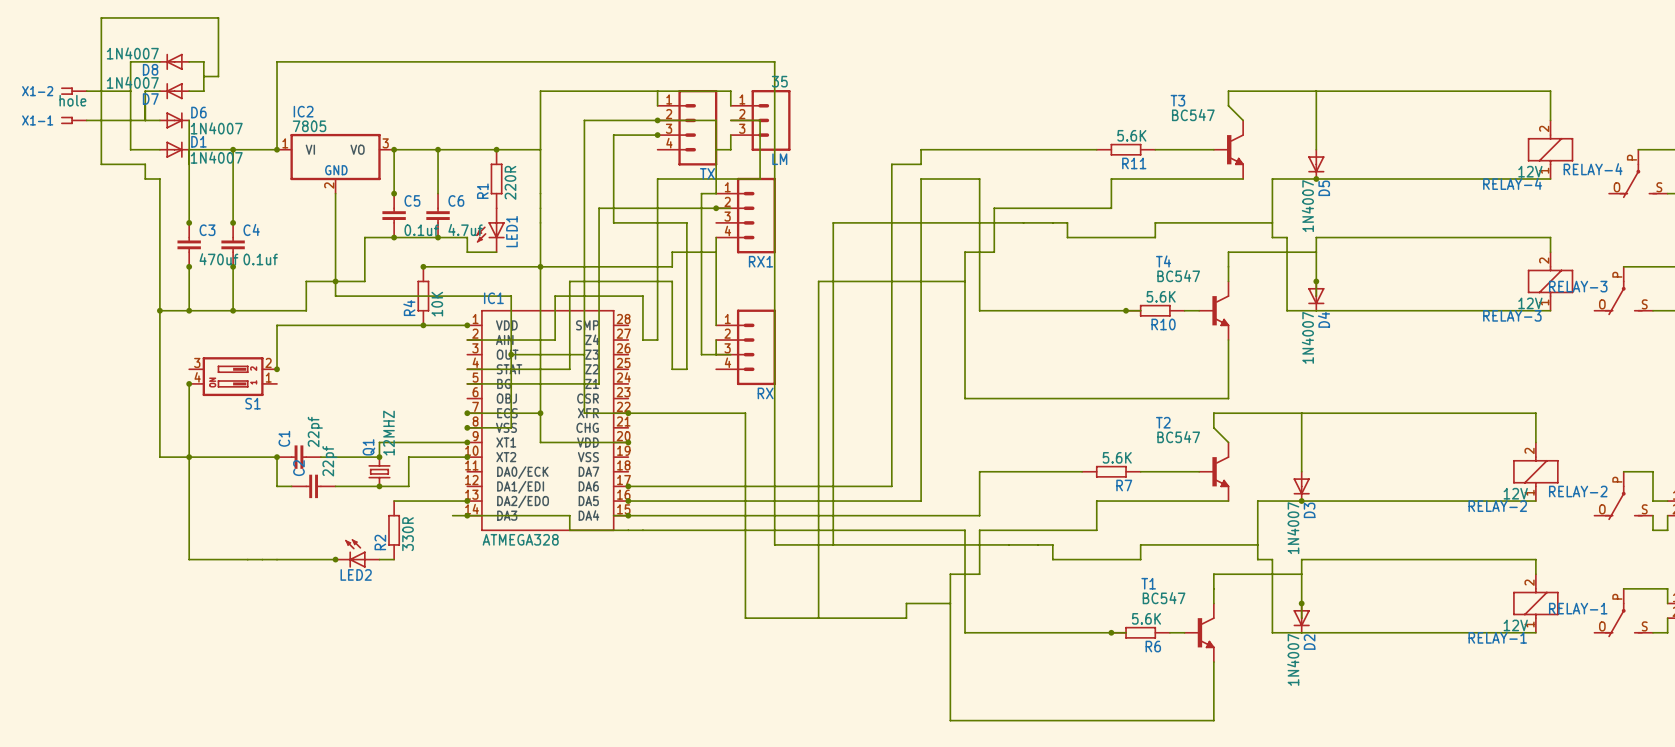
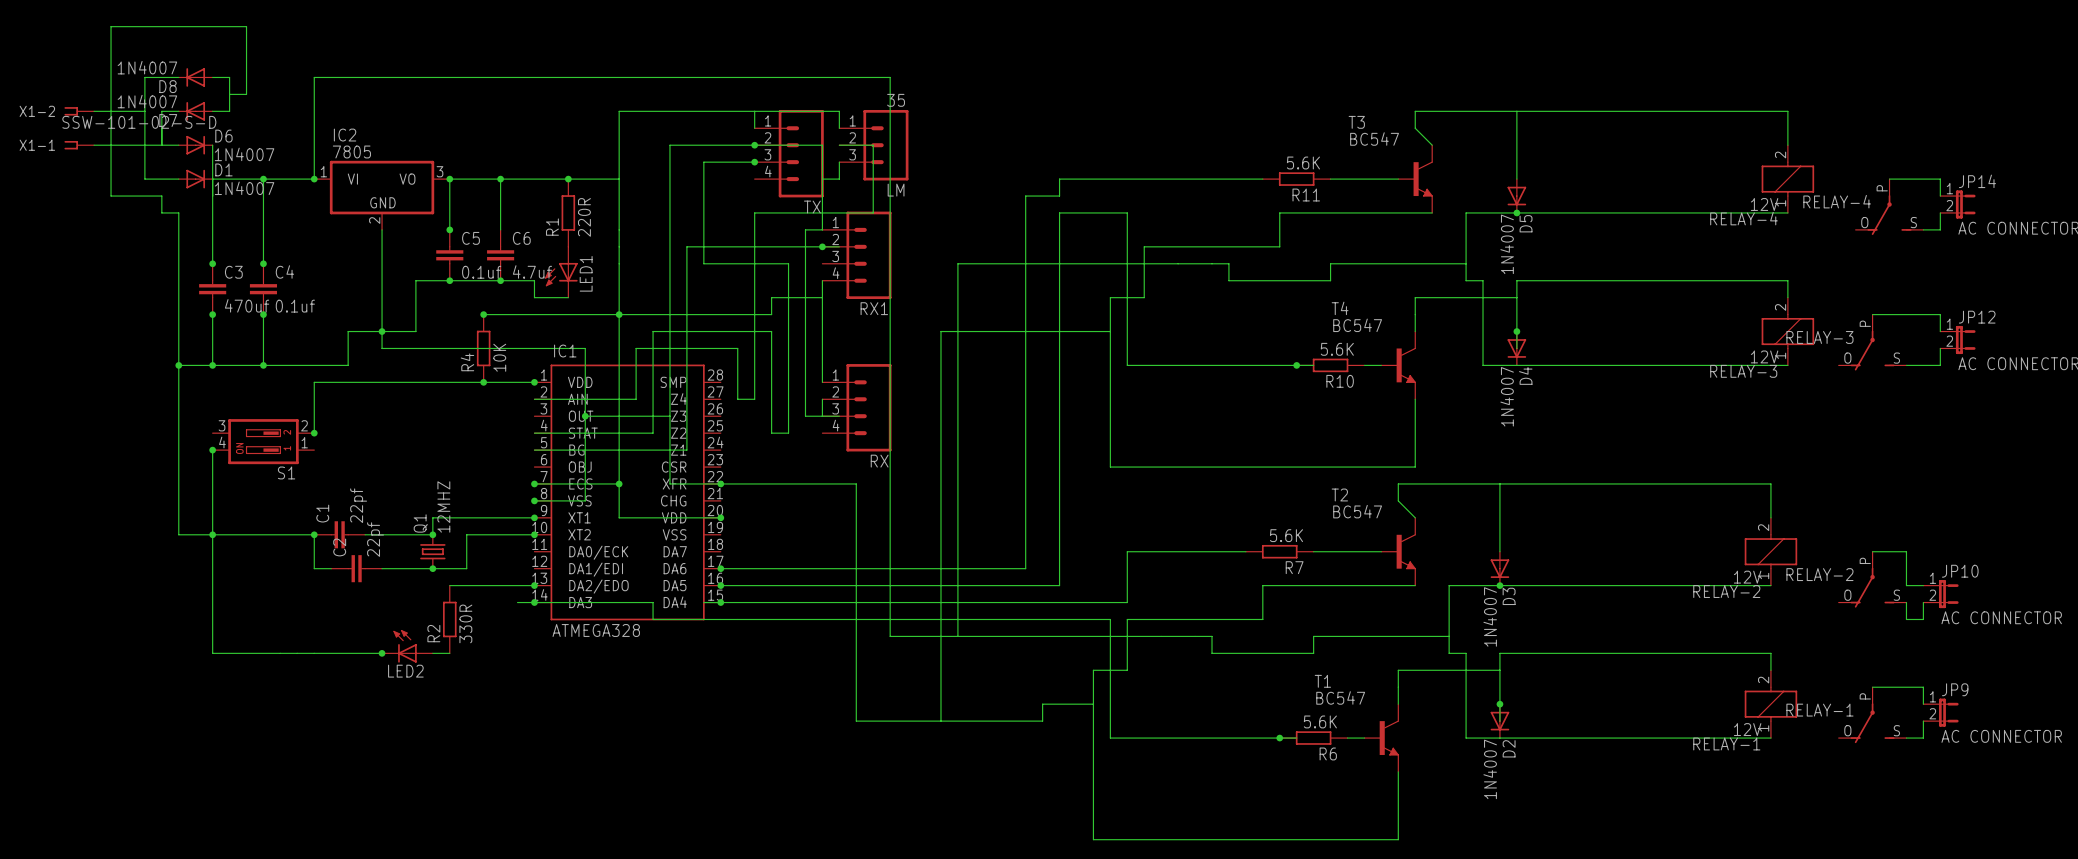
X1-1 value: hole (72, 100) -> SSW-101-02-S-D (139, 122)

